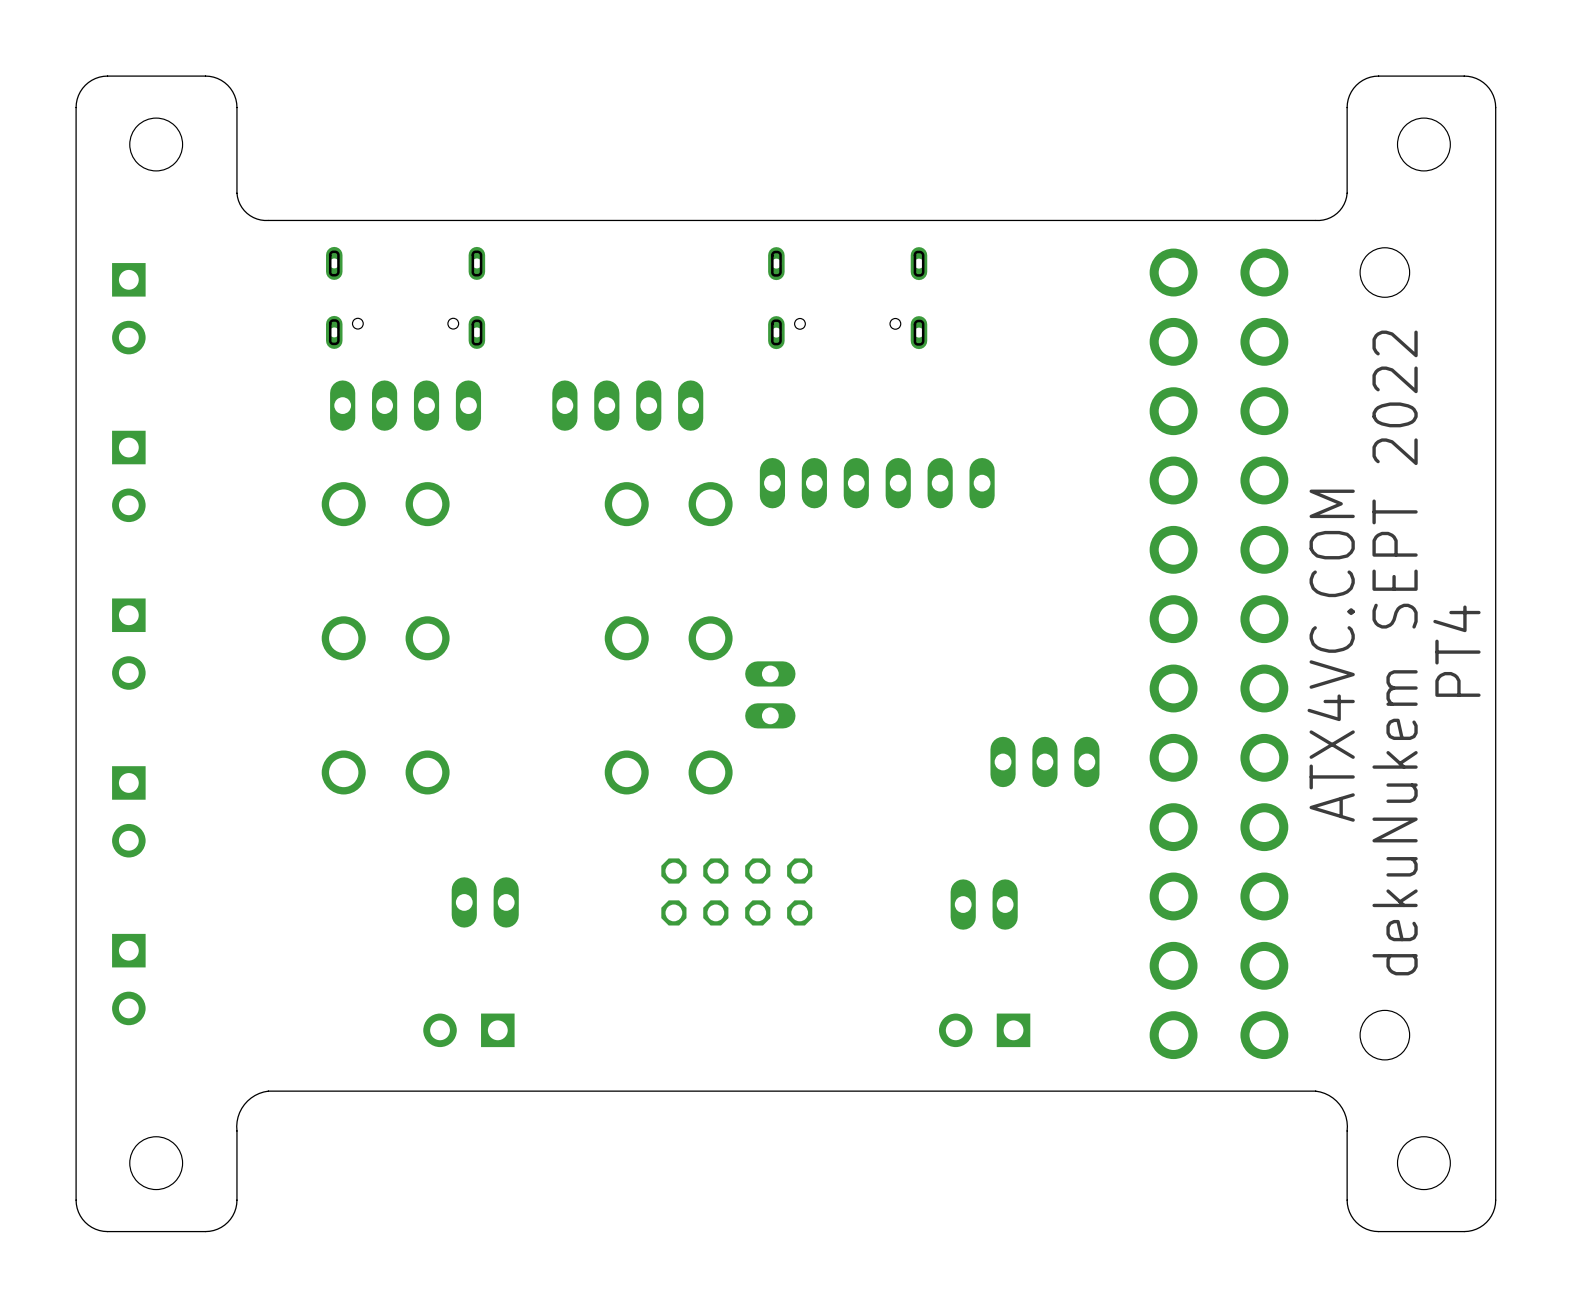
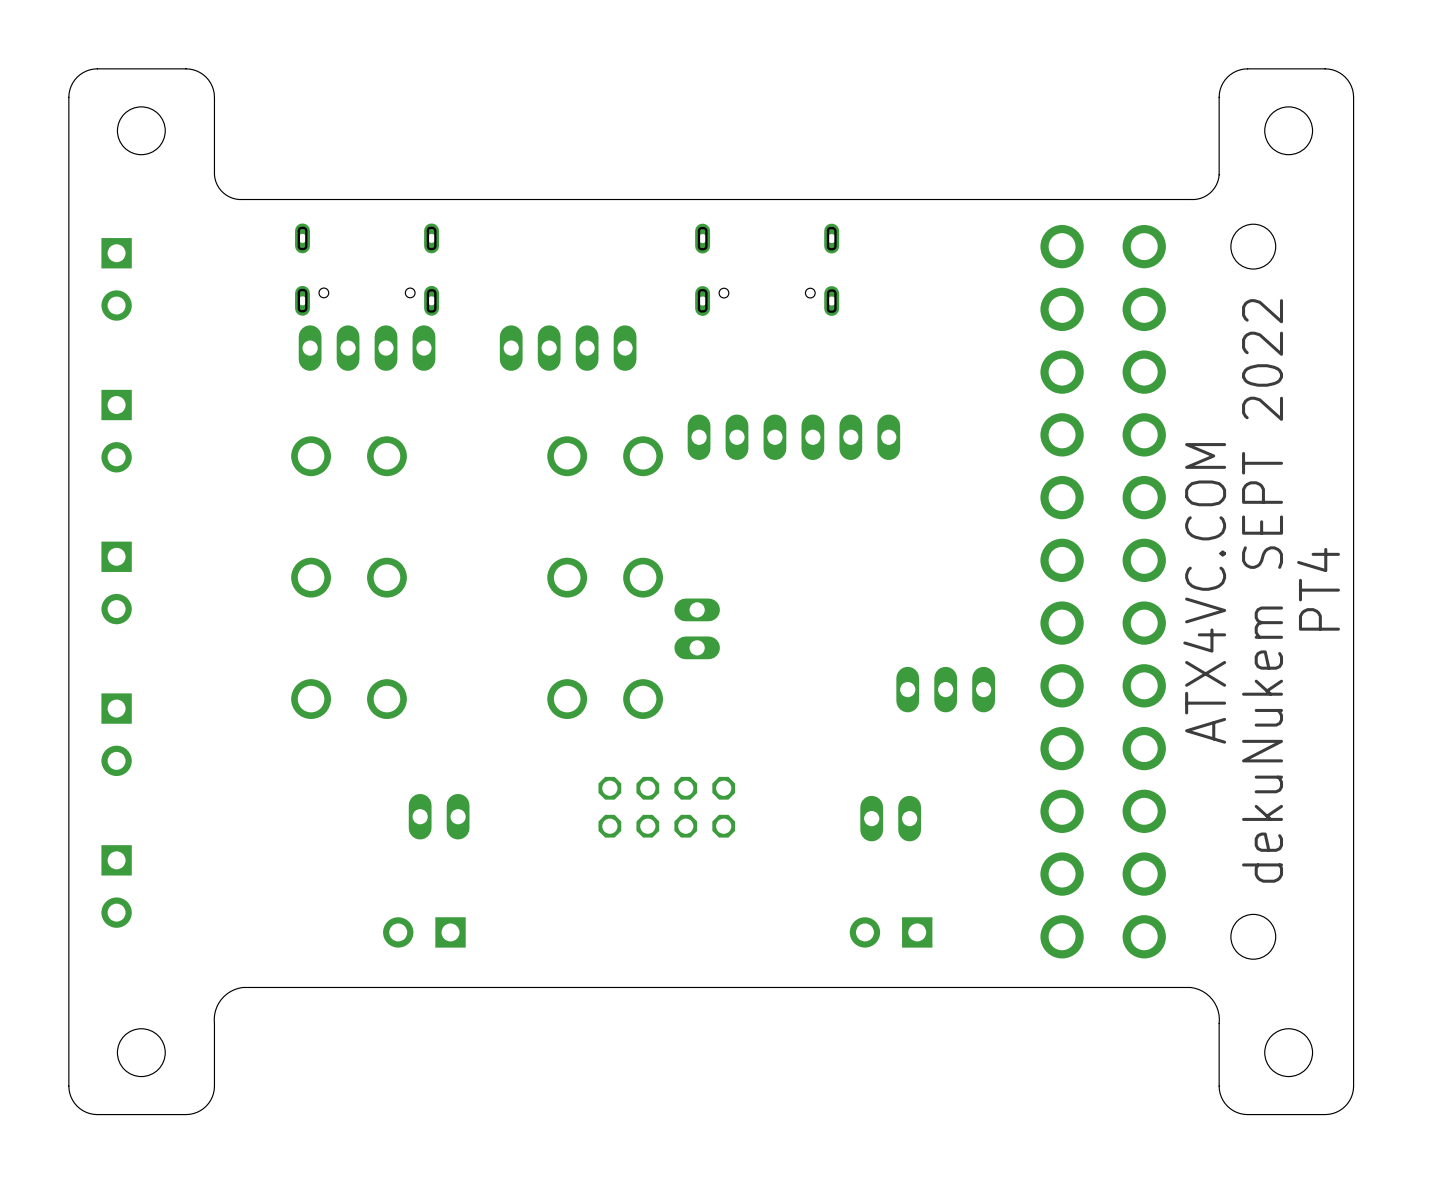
part position: (405, 405) -> (367, 348)
part position: (627, 405) -> (568, 348)

